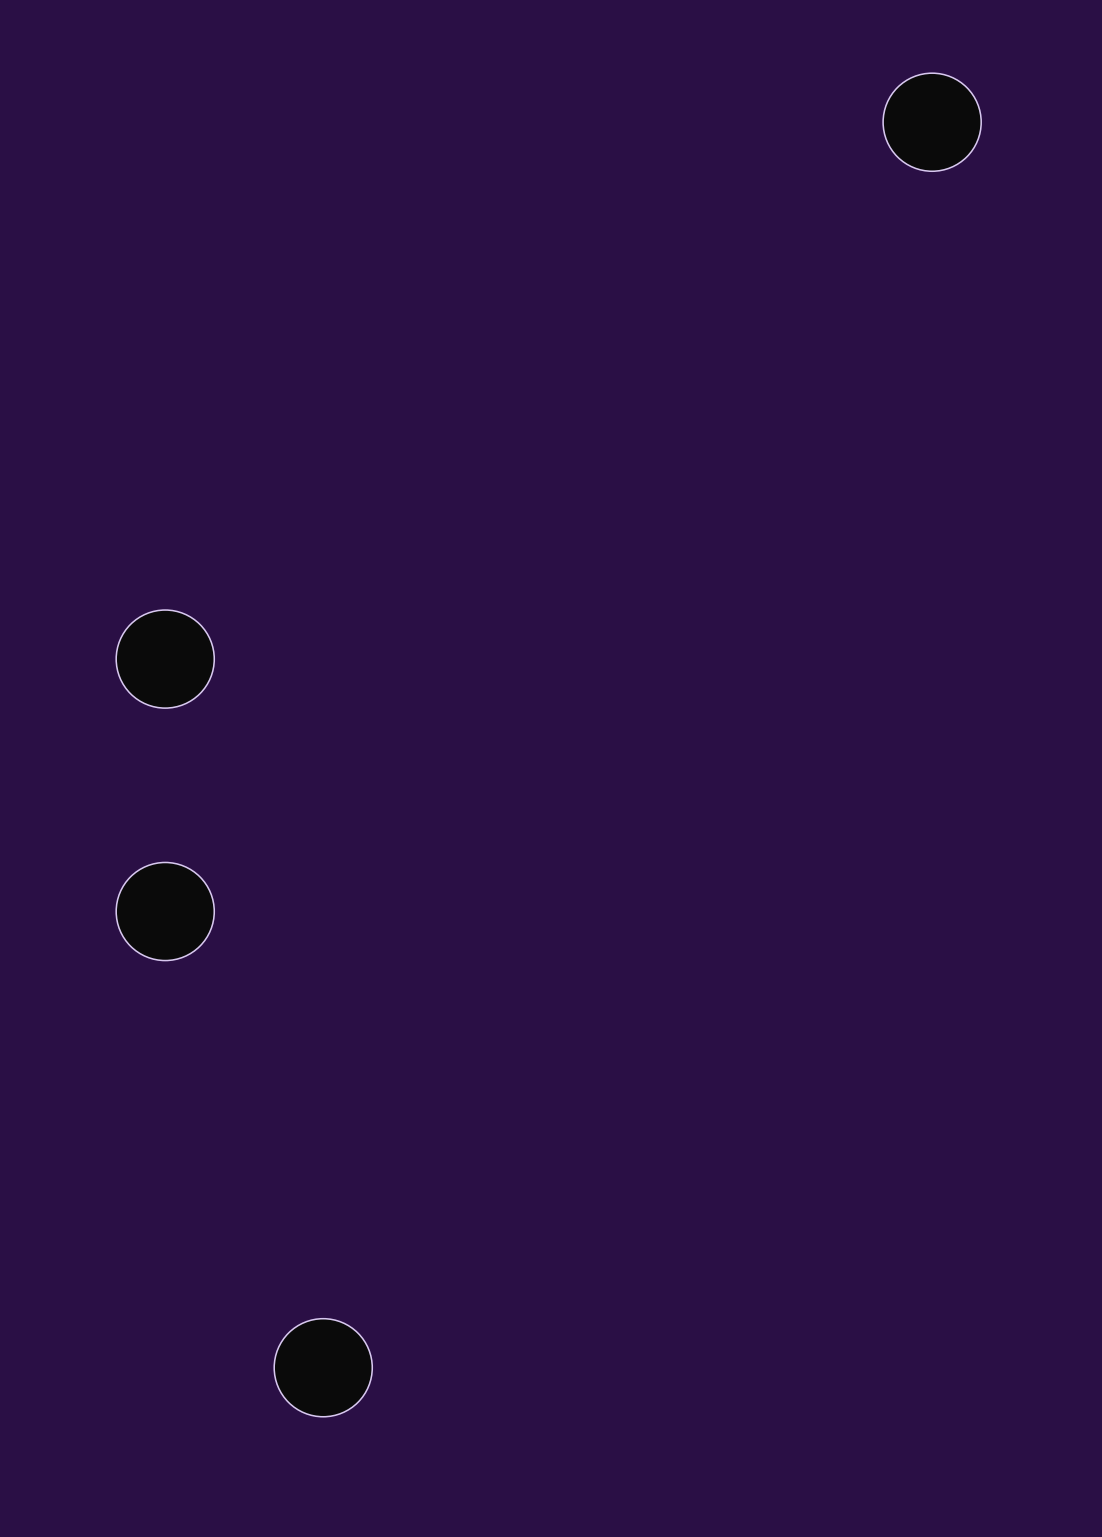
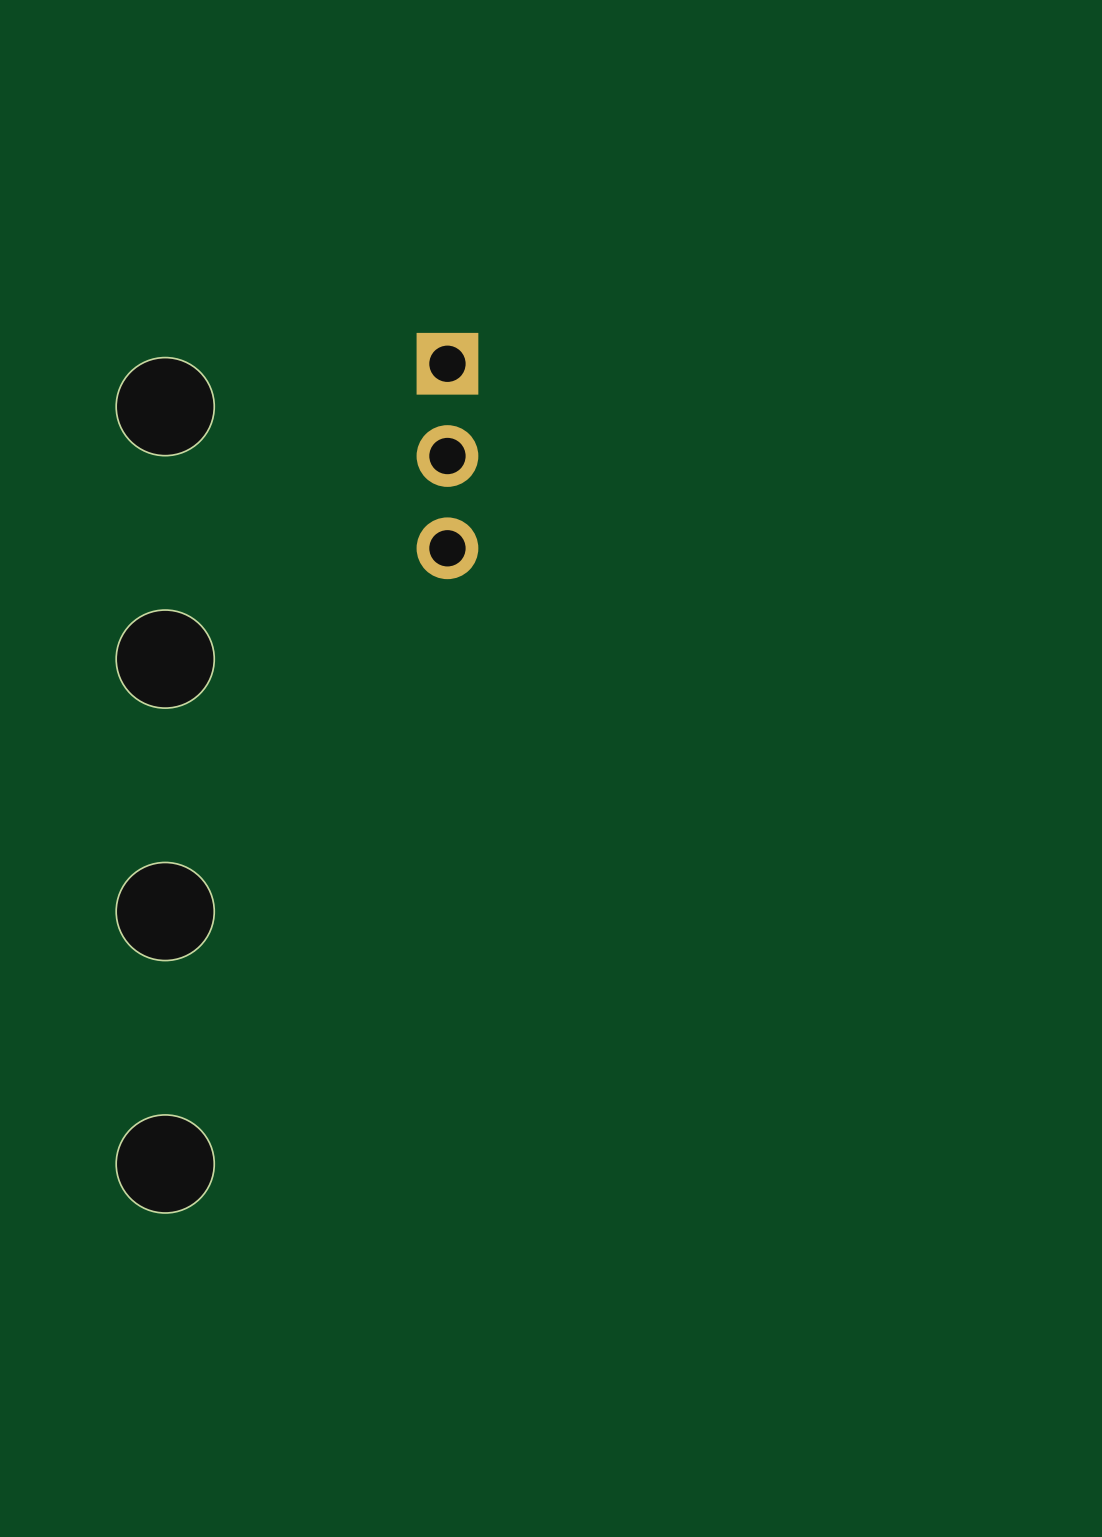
part: (932, 122) -> none
part: none -> (165, 406)
part: none -> (447, 456)
part position: (323, 1367) -> (165, 1163)

